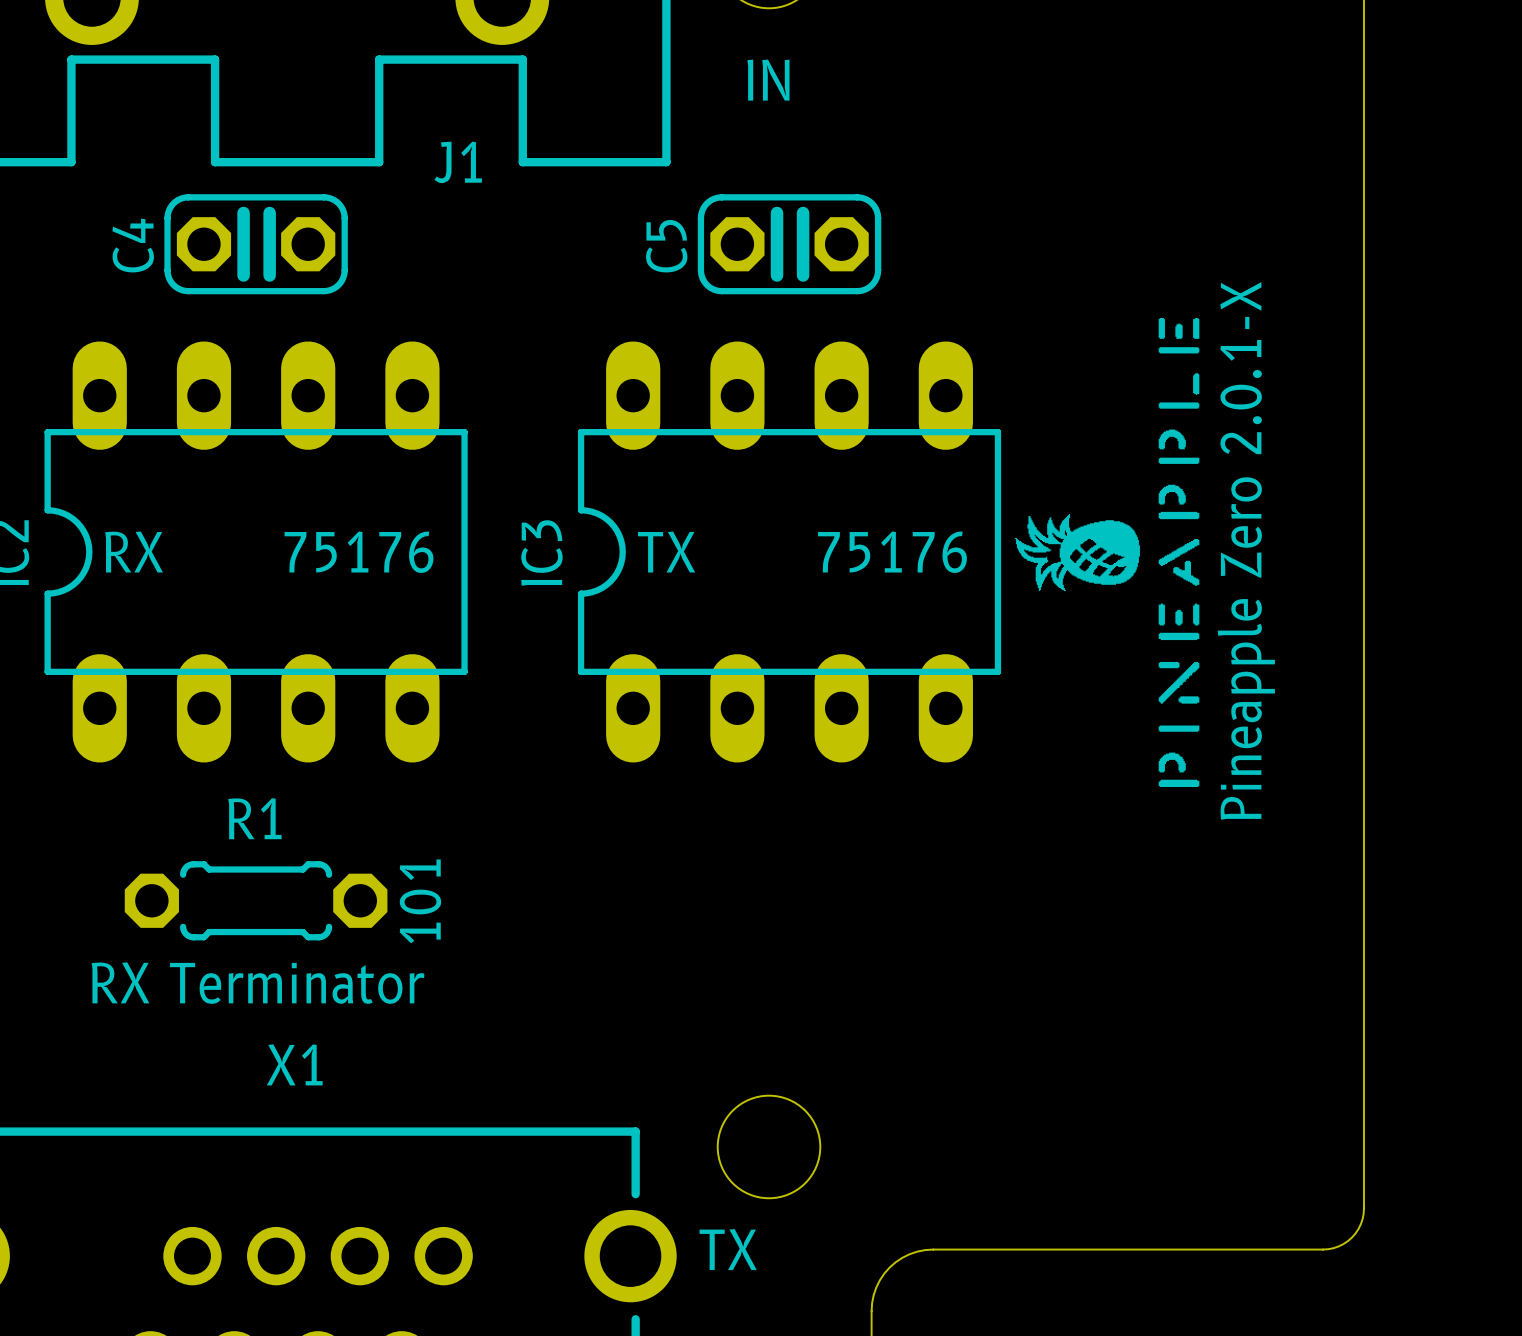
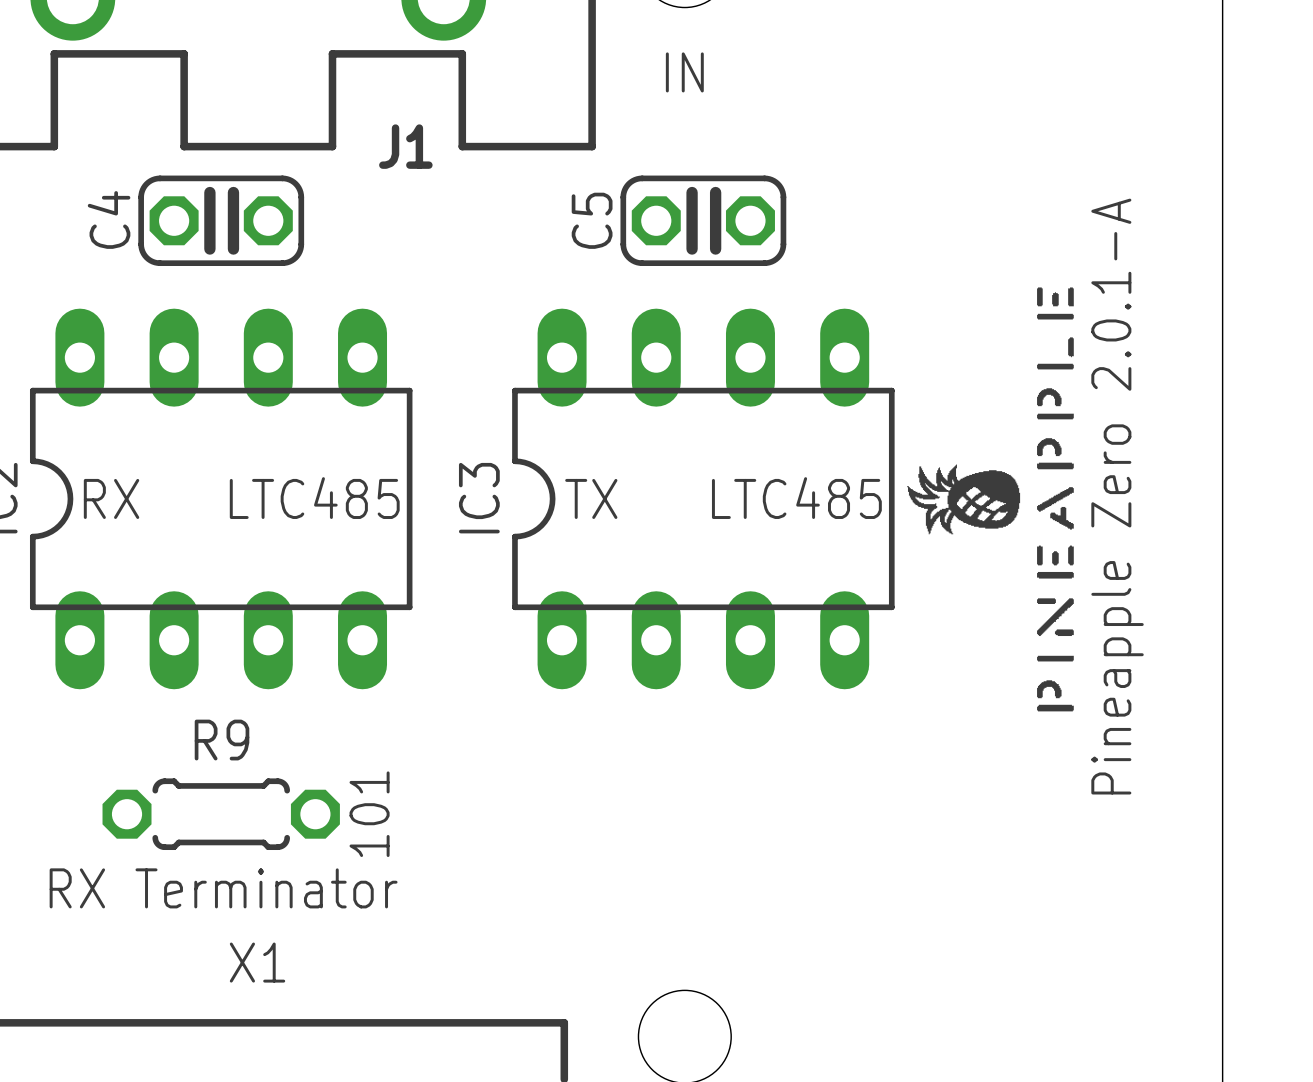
text: Pineapple Zero 2.0.1-X (1246, 550) -> Pineapple Zero 2.0.1-A (1117, 496)
text: 75176 (359, 552) -> LTC485 (314, 498)
text: 75176 (892, 552) -> LTC485 (796, 498)
R1 name: R1 (254, 818) -> R9 (222, 740)

